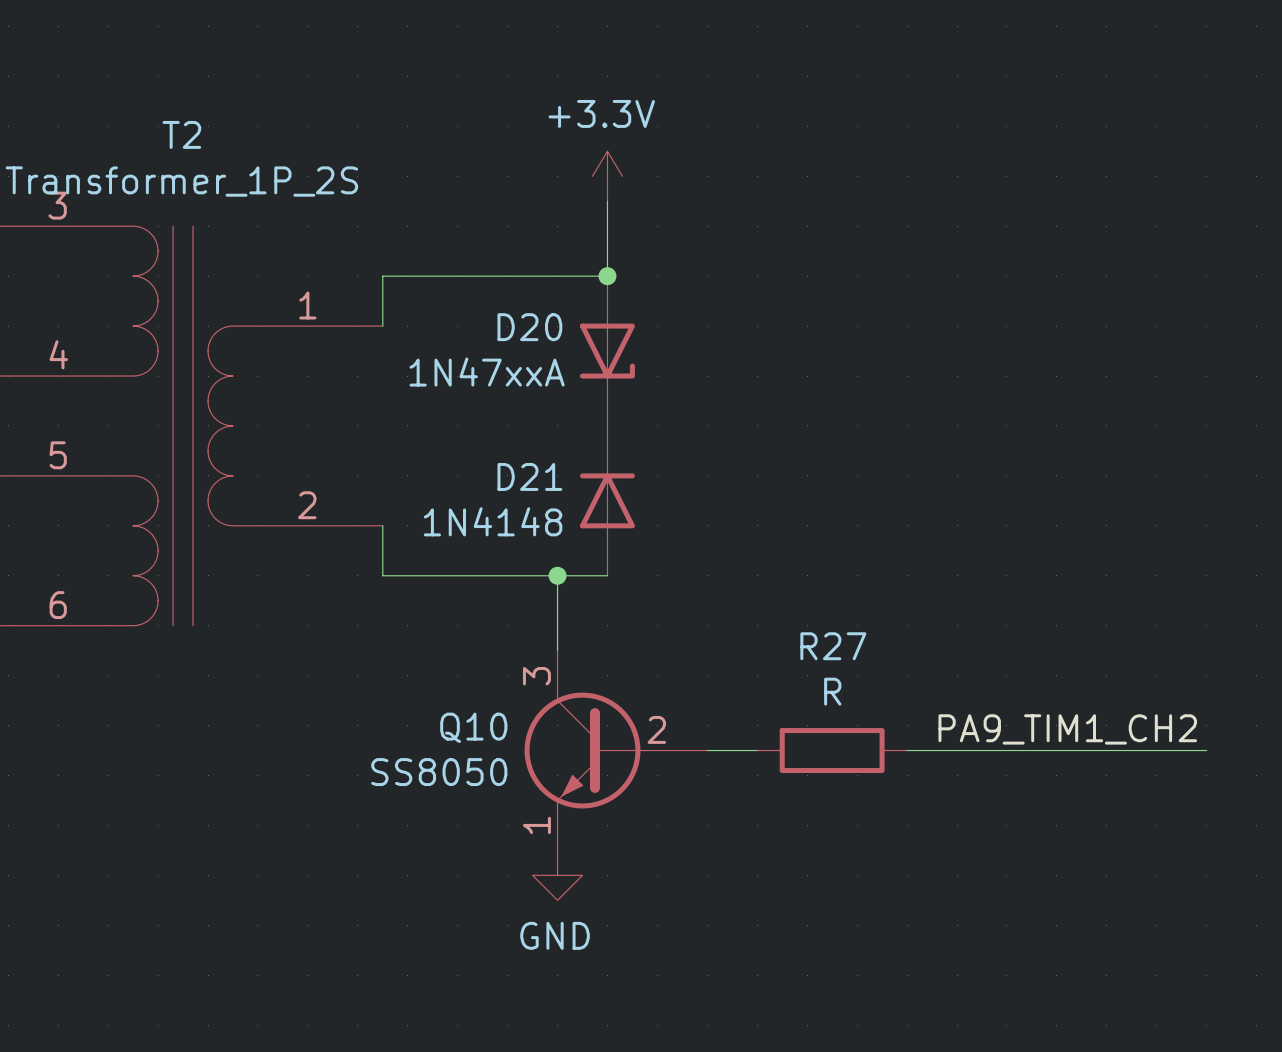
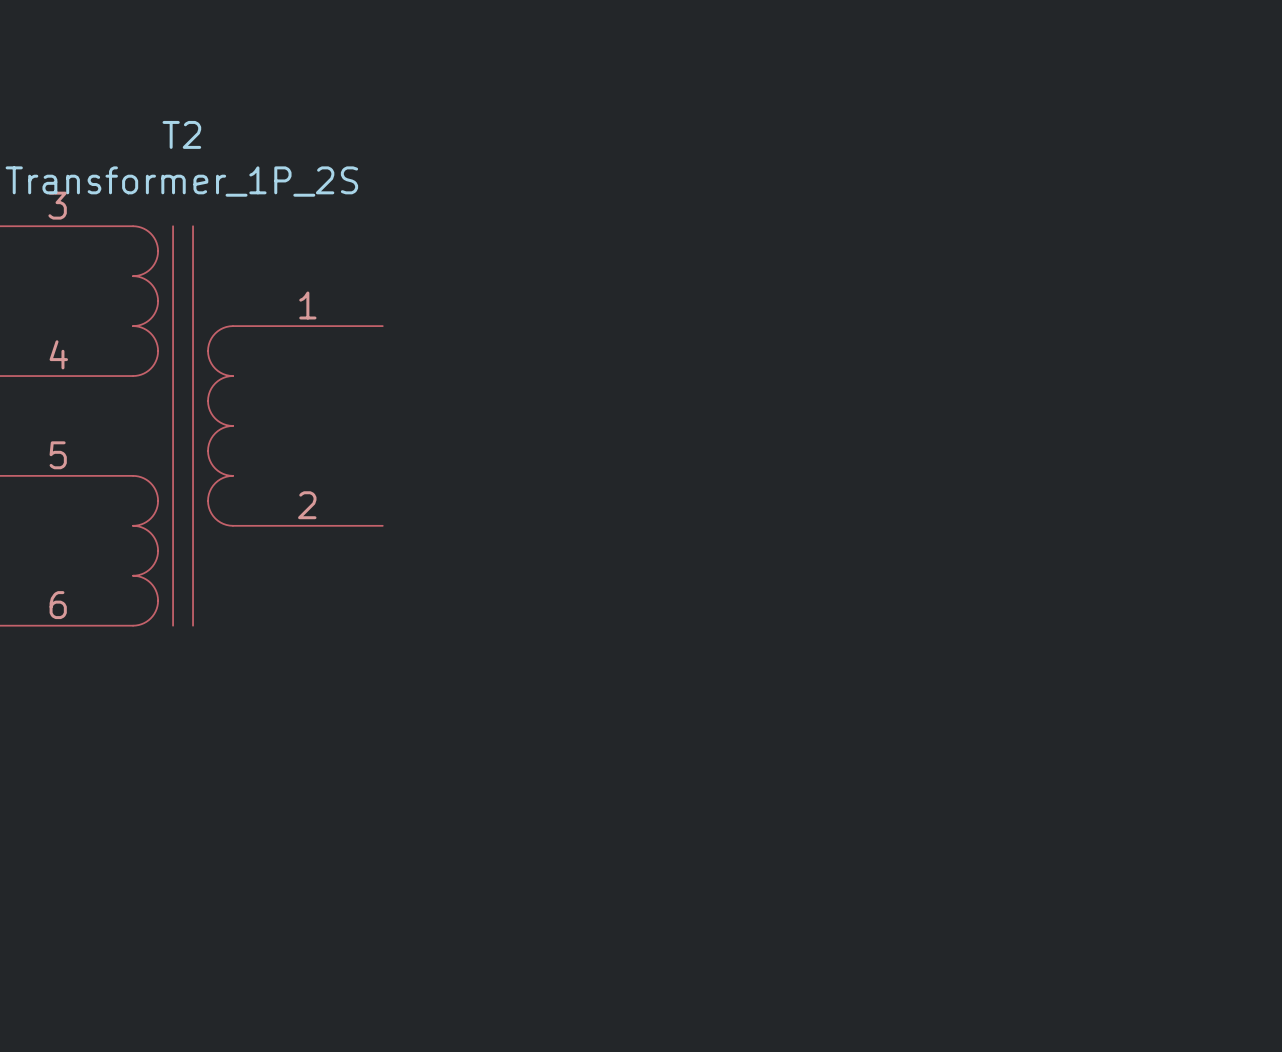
power symbol: +3.3V (607, 176) -> none
wire: (607, 201) (607, 276) (382, 276) (382, 326) -> none
junction: (607, 276) -> none
D20: 1N47xxA (607, 351) -> none
D21: 1N4148 (607, 500) -> none
wire: (382, 525) (382, 575) (607, 575) -> none
wire: (557, 575) (557, 650) -> none
junction: (557, 575) -> none
label: PA9_TIM1_CH2 (1067, 729) -> none
Q10: SS8050 (615, 750) -> none
wire: (707, 750) (757, 750) -> none
R27: R (832, 750) -> none
wire: (907, 750) (1206, 750) -> none
power symbol: GND (557, 875) -> none

